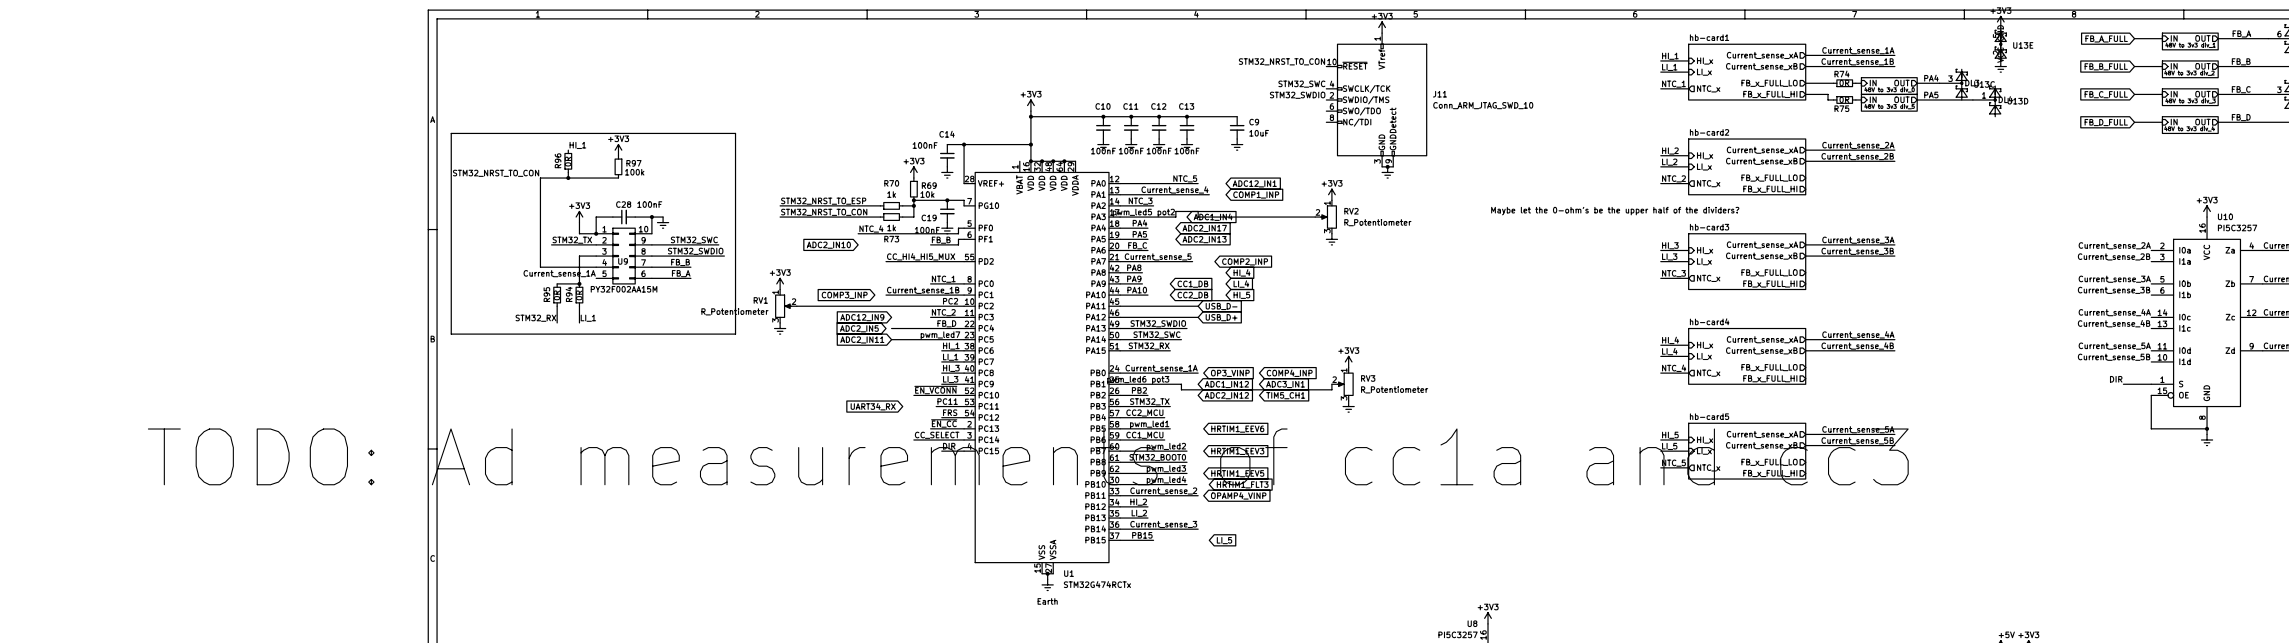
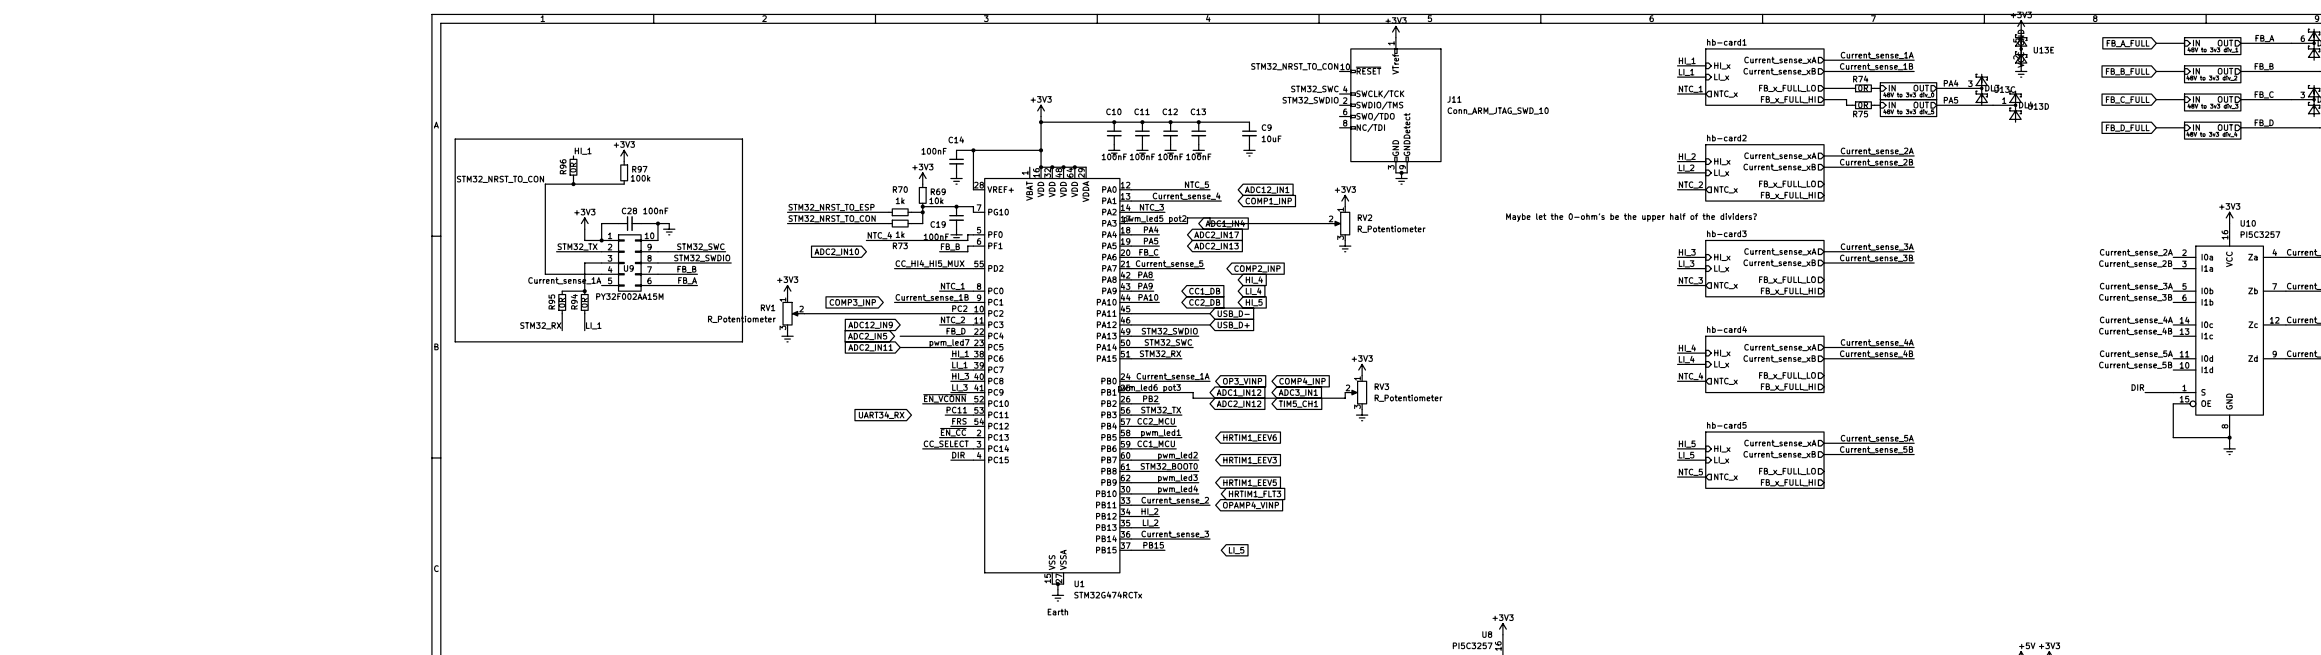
text: TODO: Ad measurements of cc1a and cc3 (1028, 456) -> none

